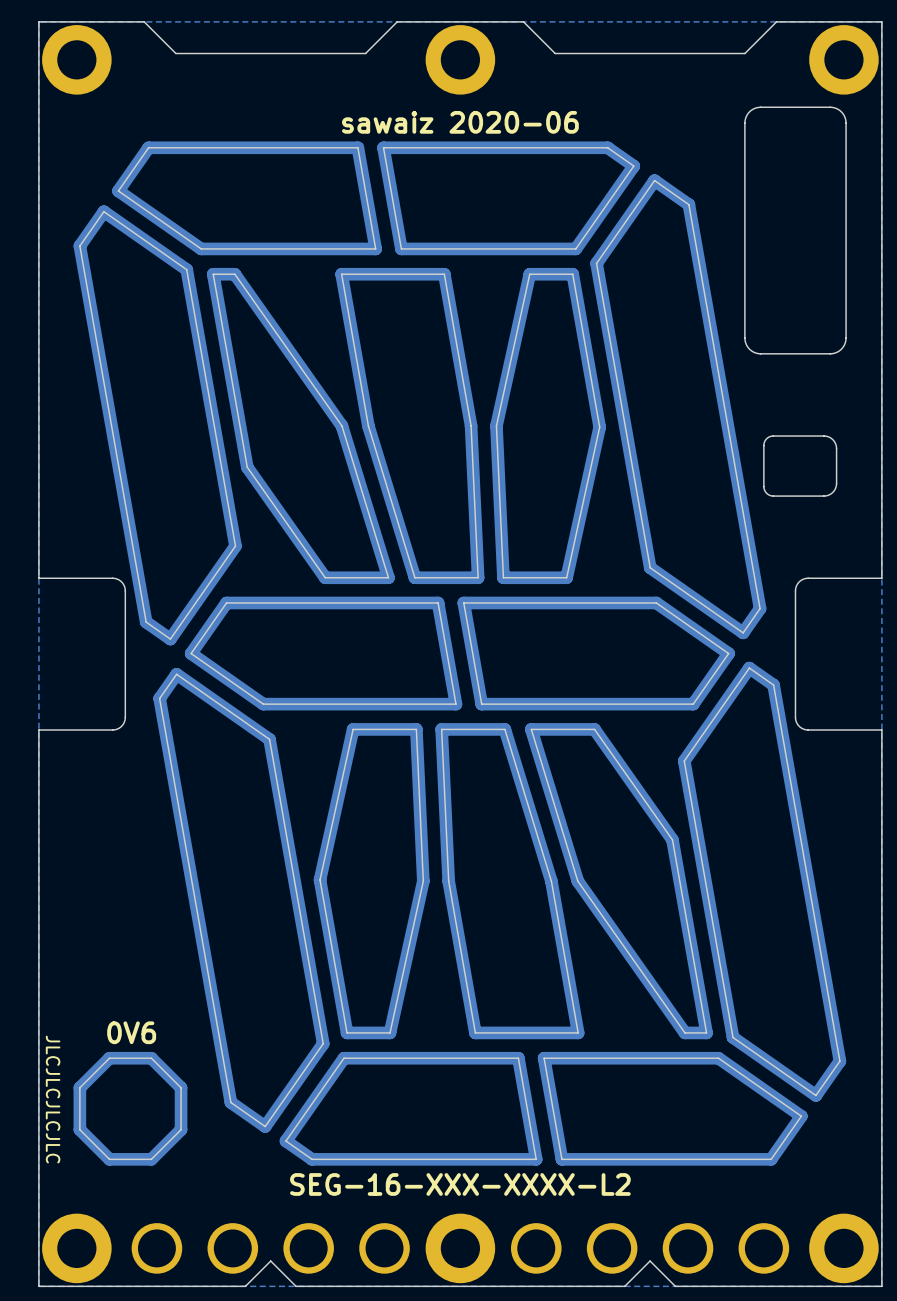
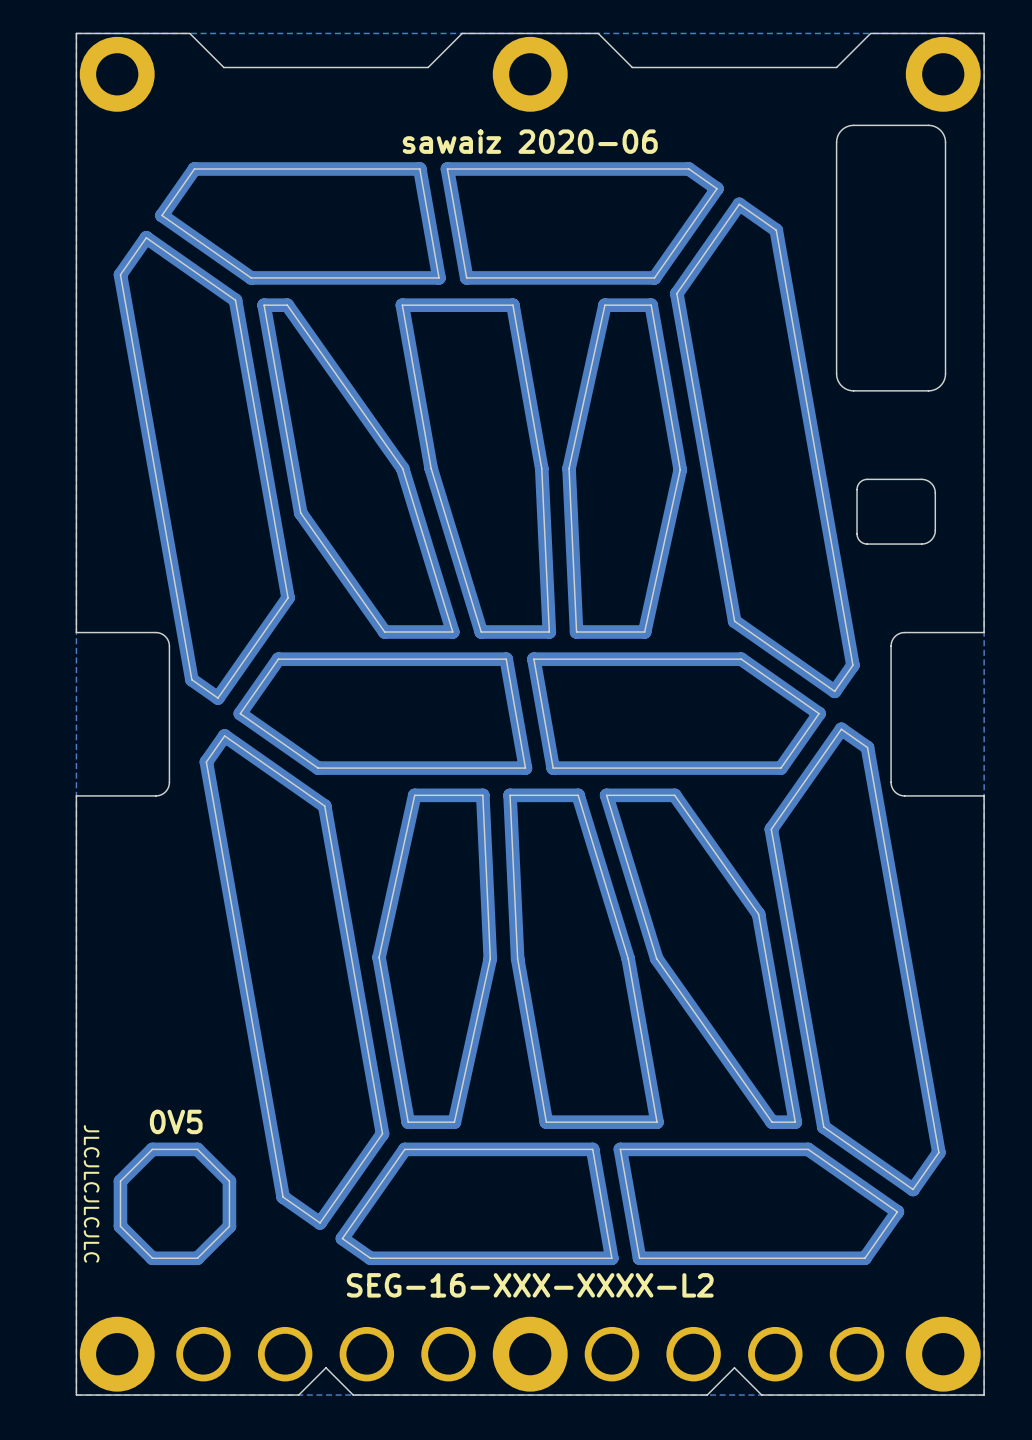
text: 0V6 (131, 1032) -> 0V5 (176, 1121)

